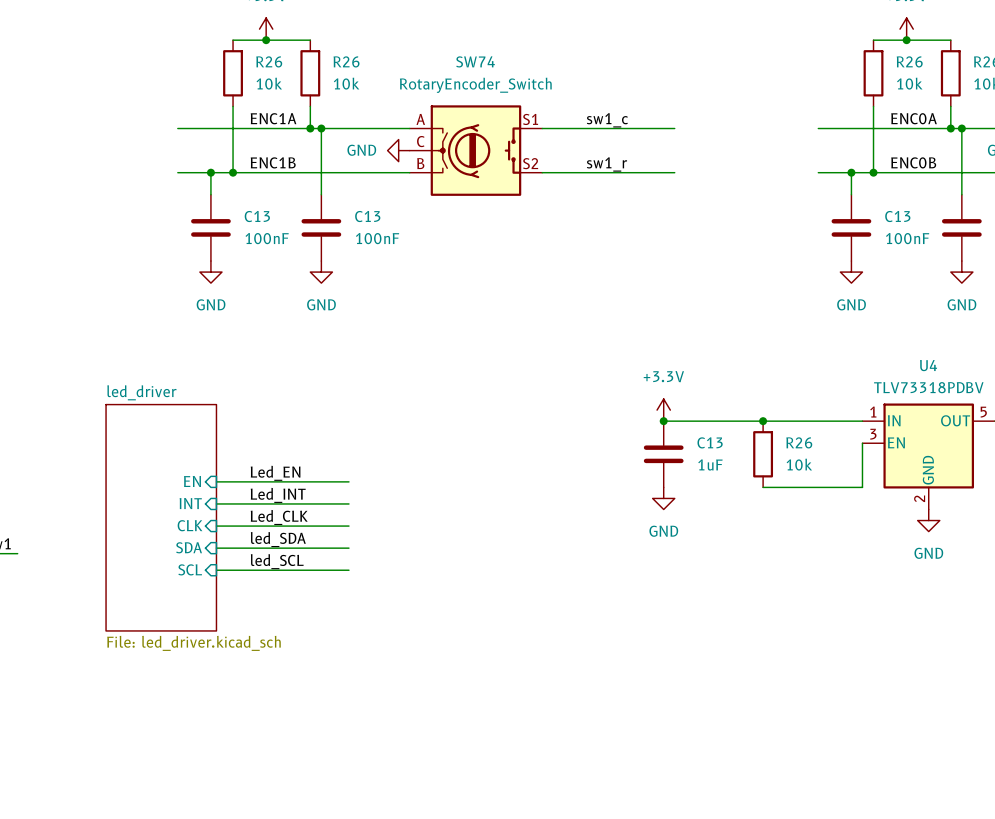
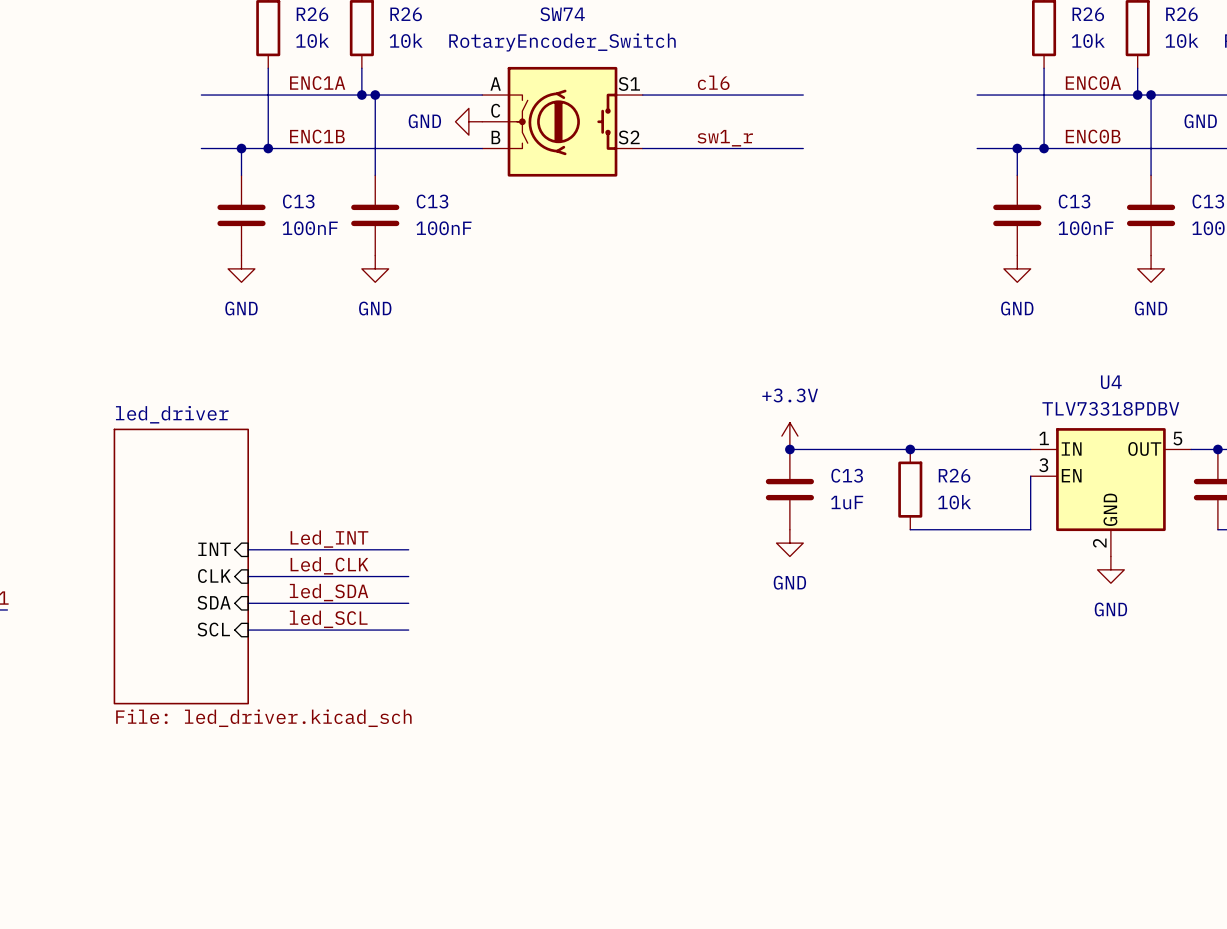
label: sw1_c (607, 120) -> cl6 (713, 82)
label: Led_EN (275, 473) -> none
sheet pin: EN (192, 481) -> none
wire: (216, 481) (348, 481) -> none

